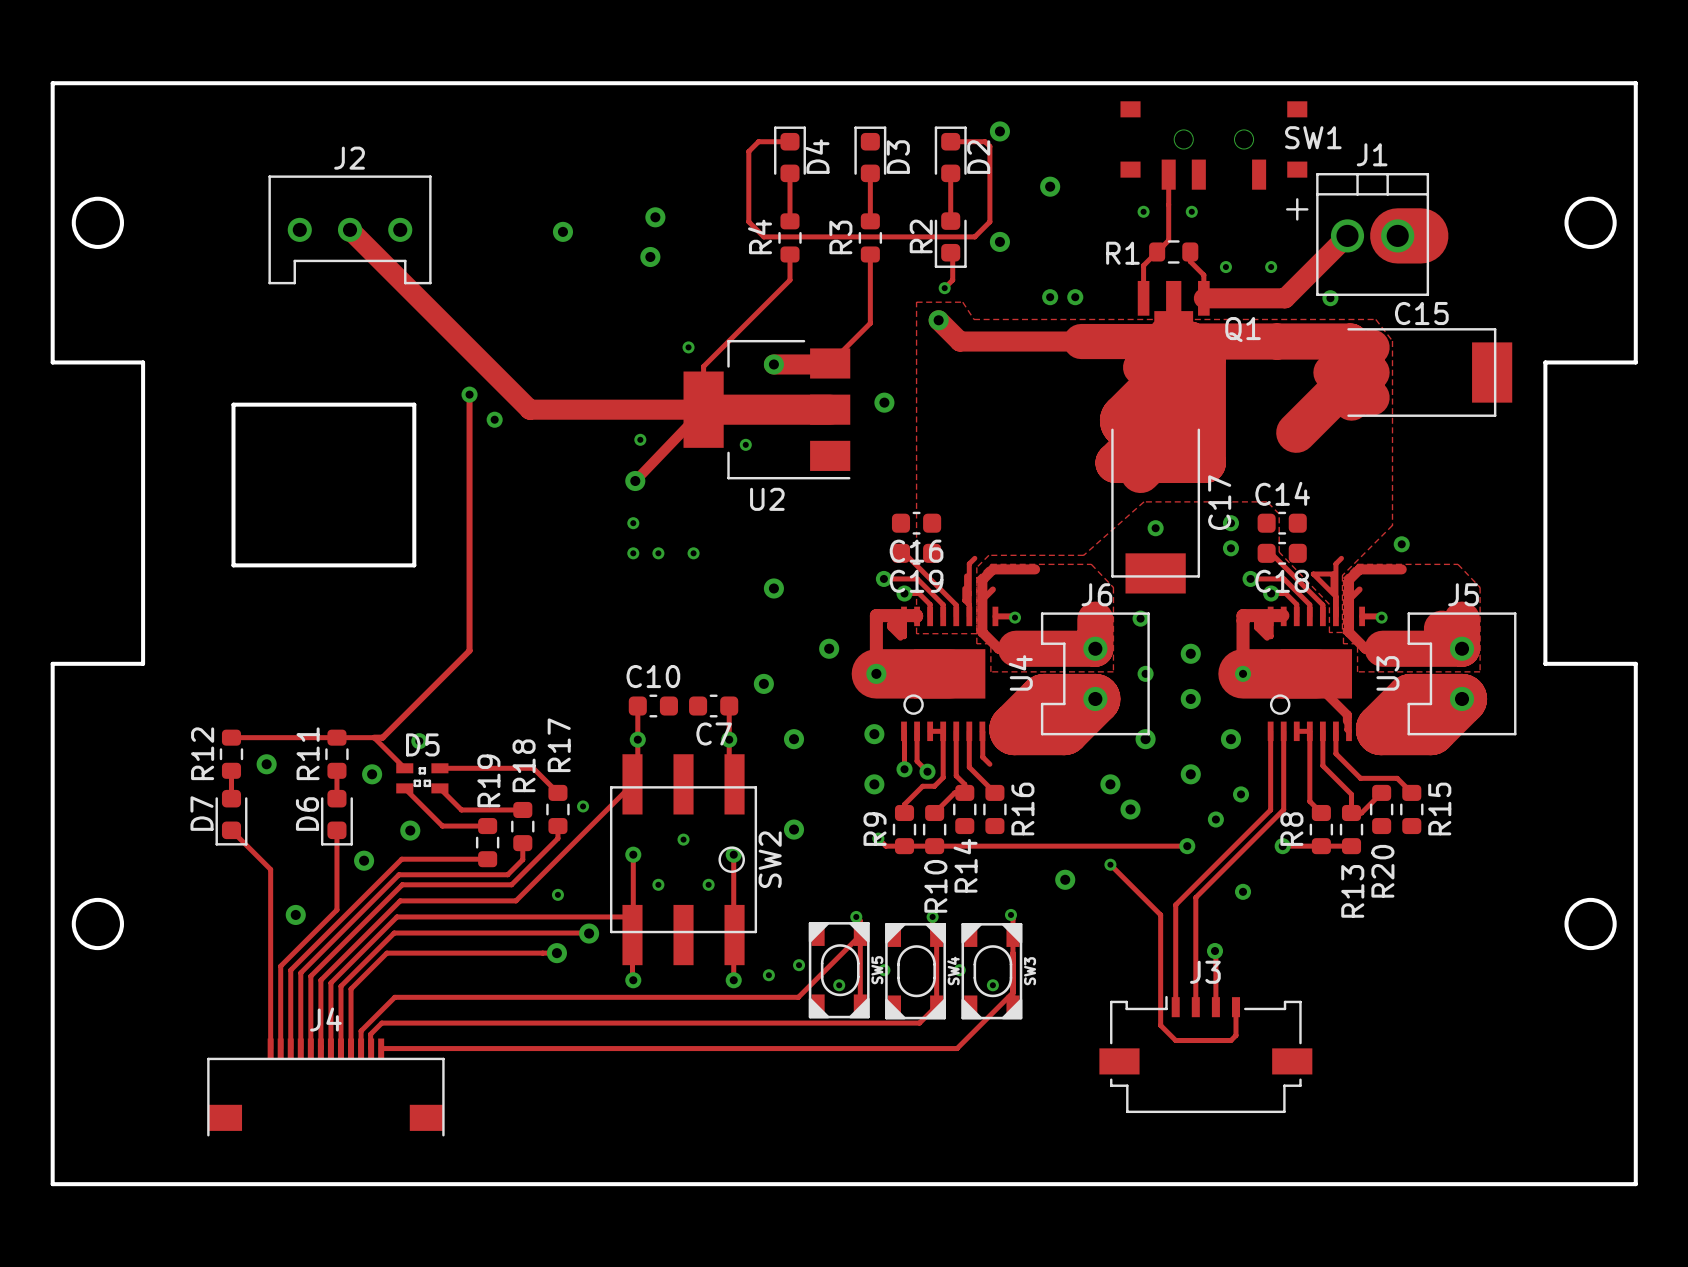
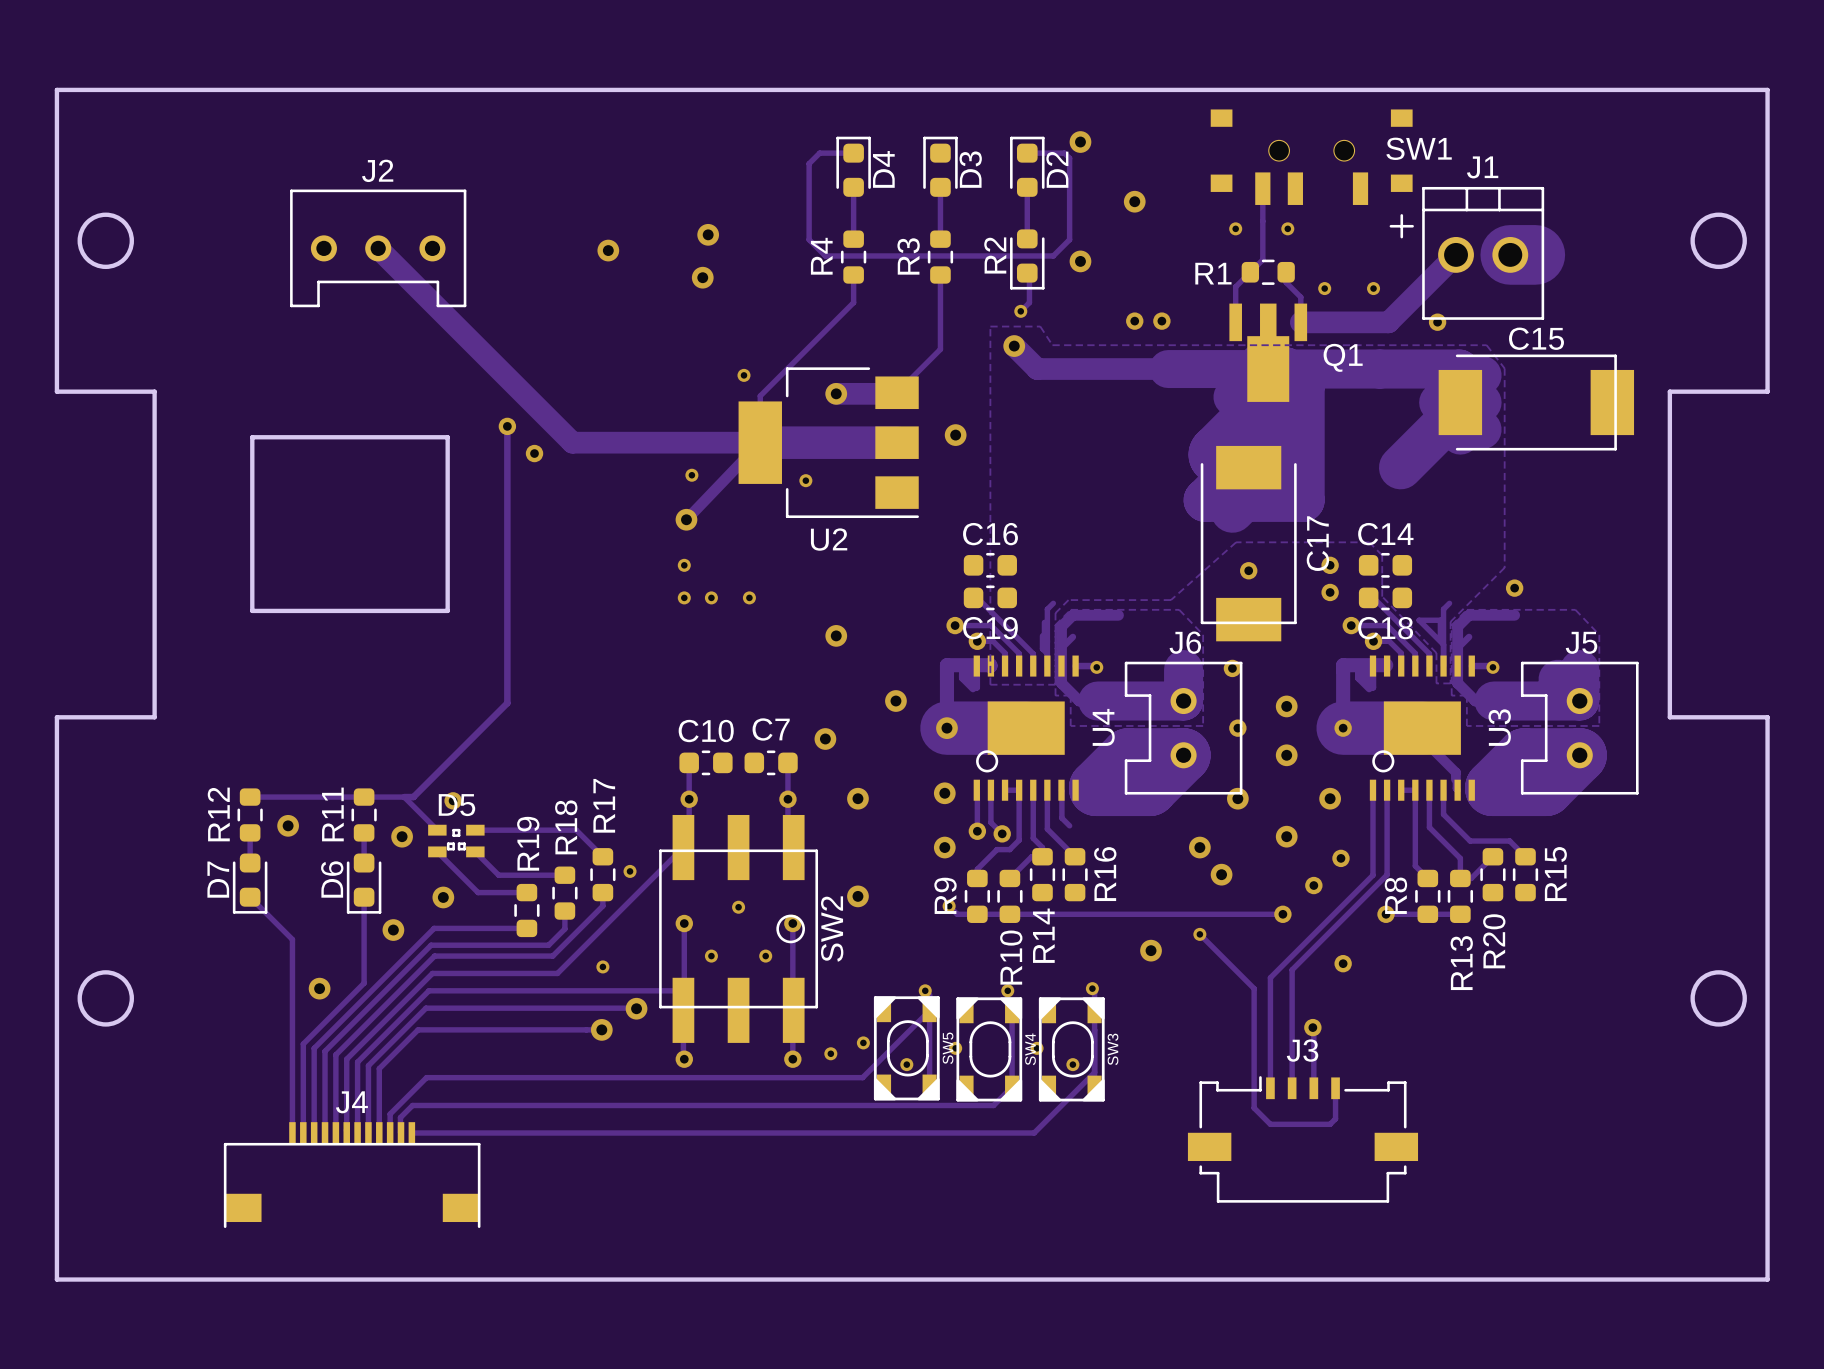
C16 name position: C16 (916, 551) -> C16 (990, 534)
C7 name position: C7 (714, 733) -> C7 (771, 729)

